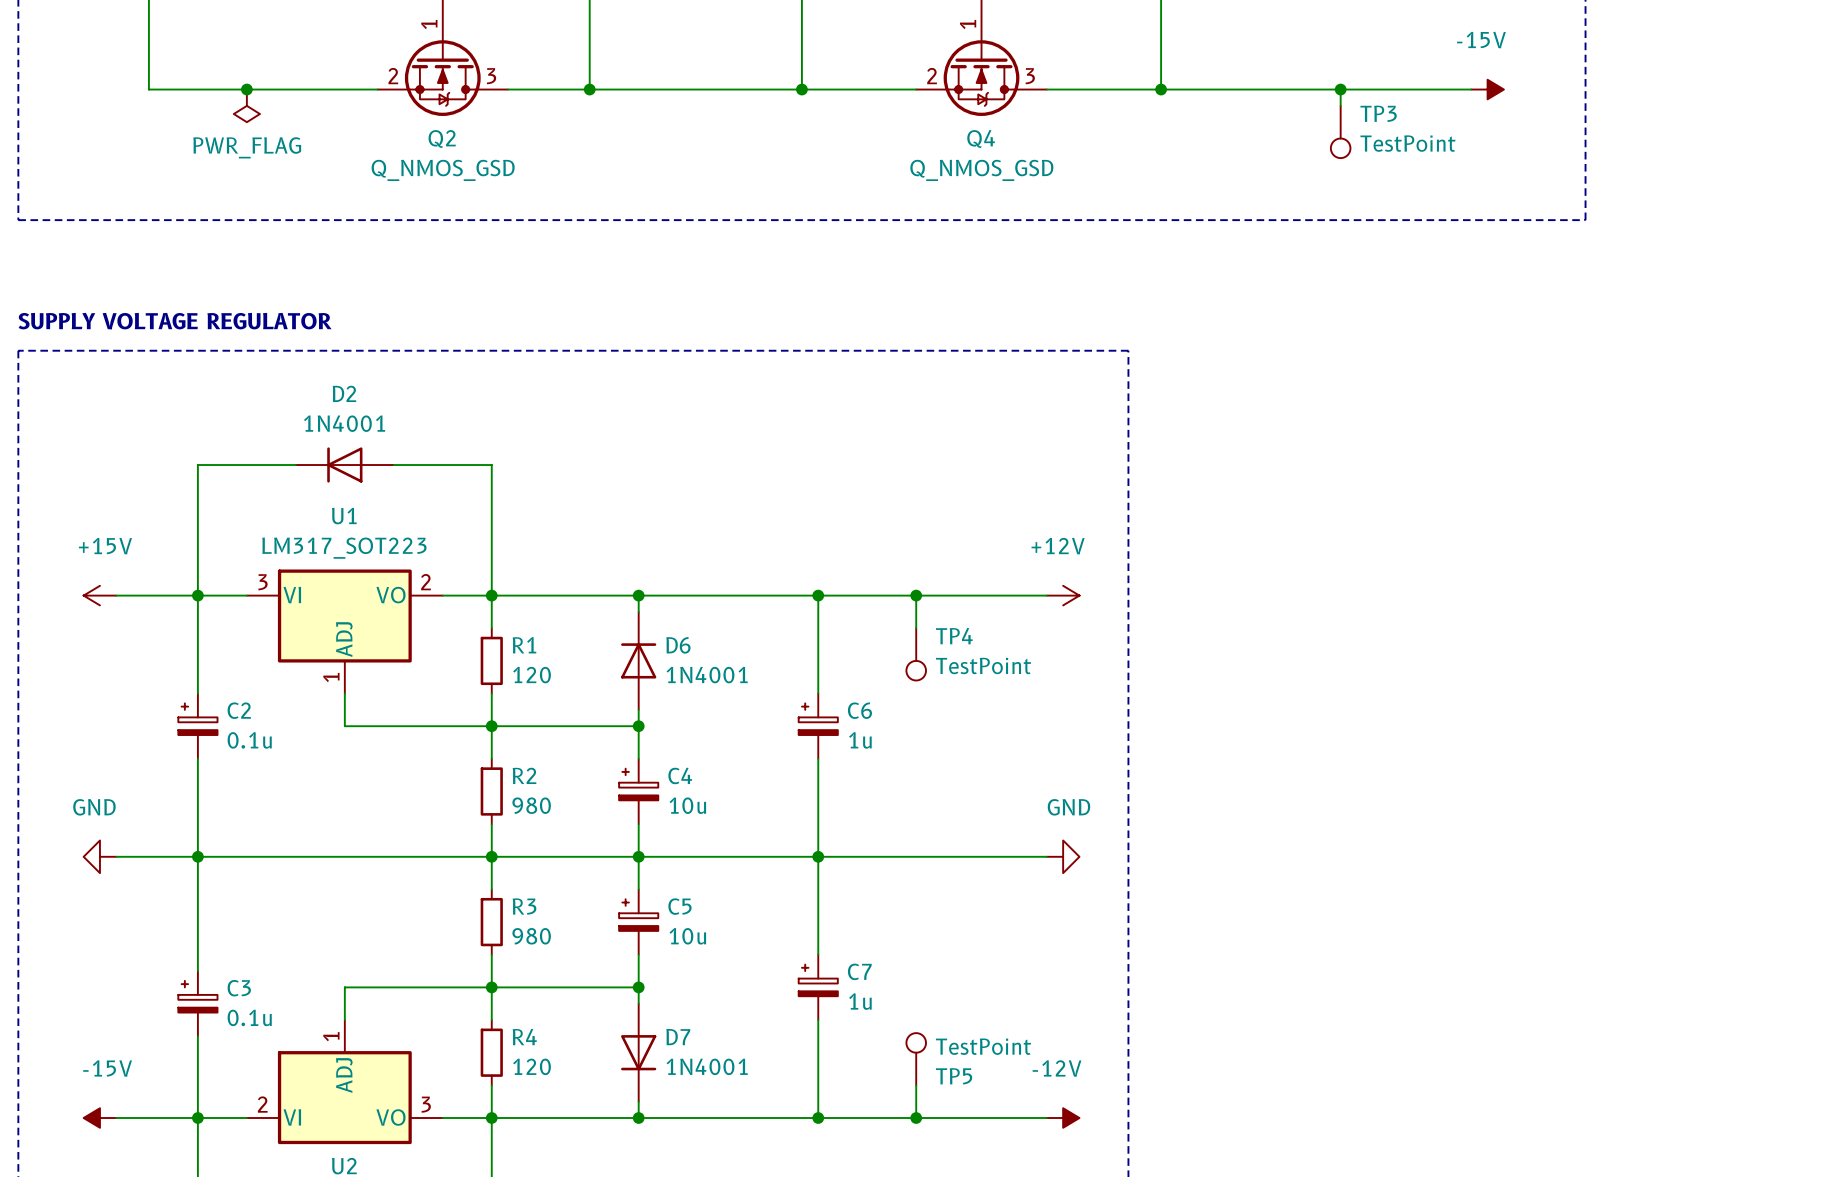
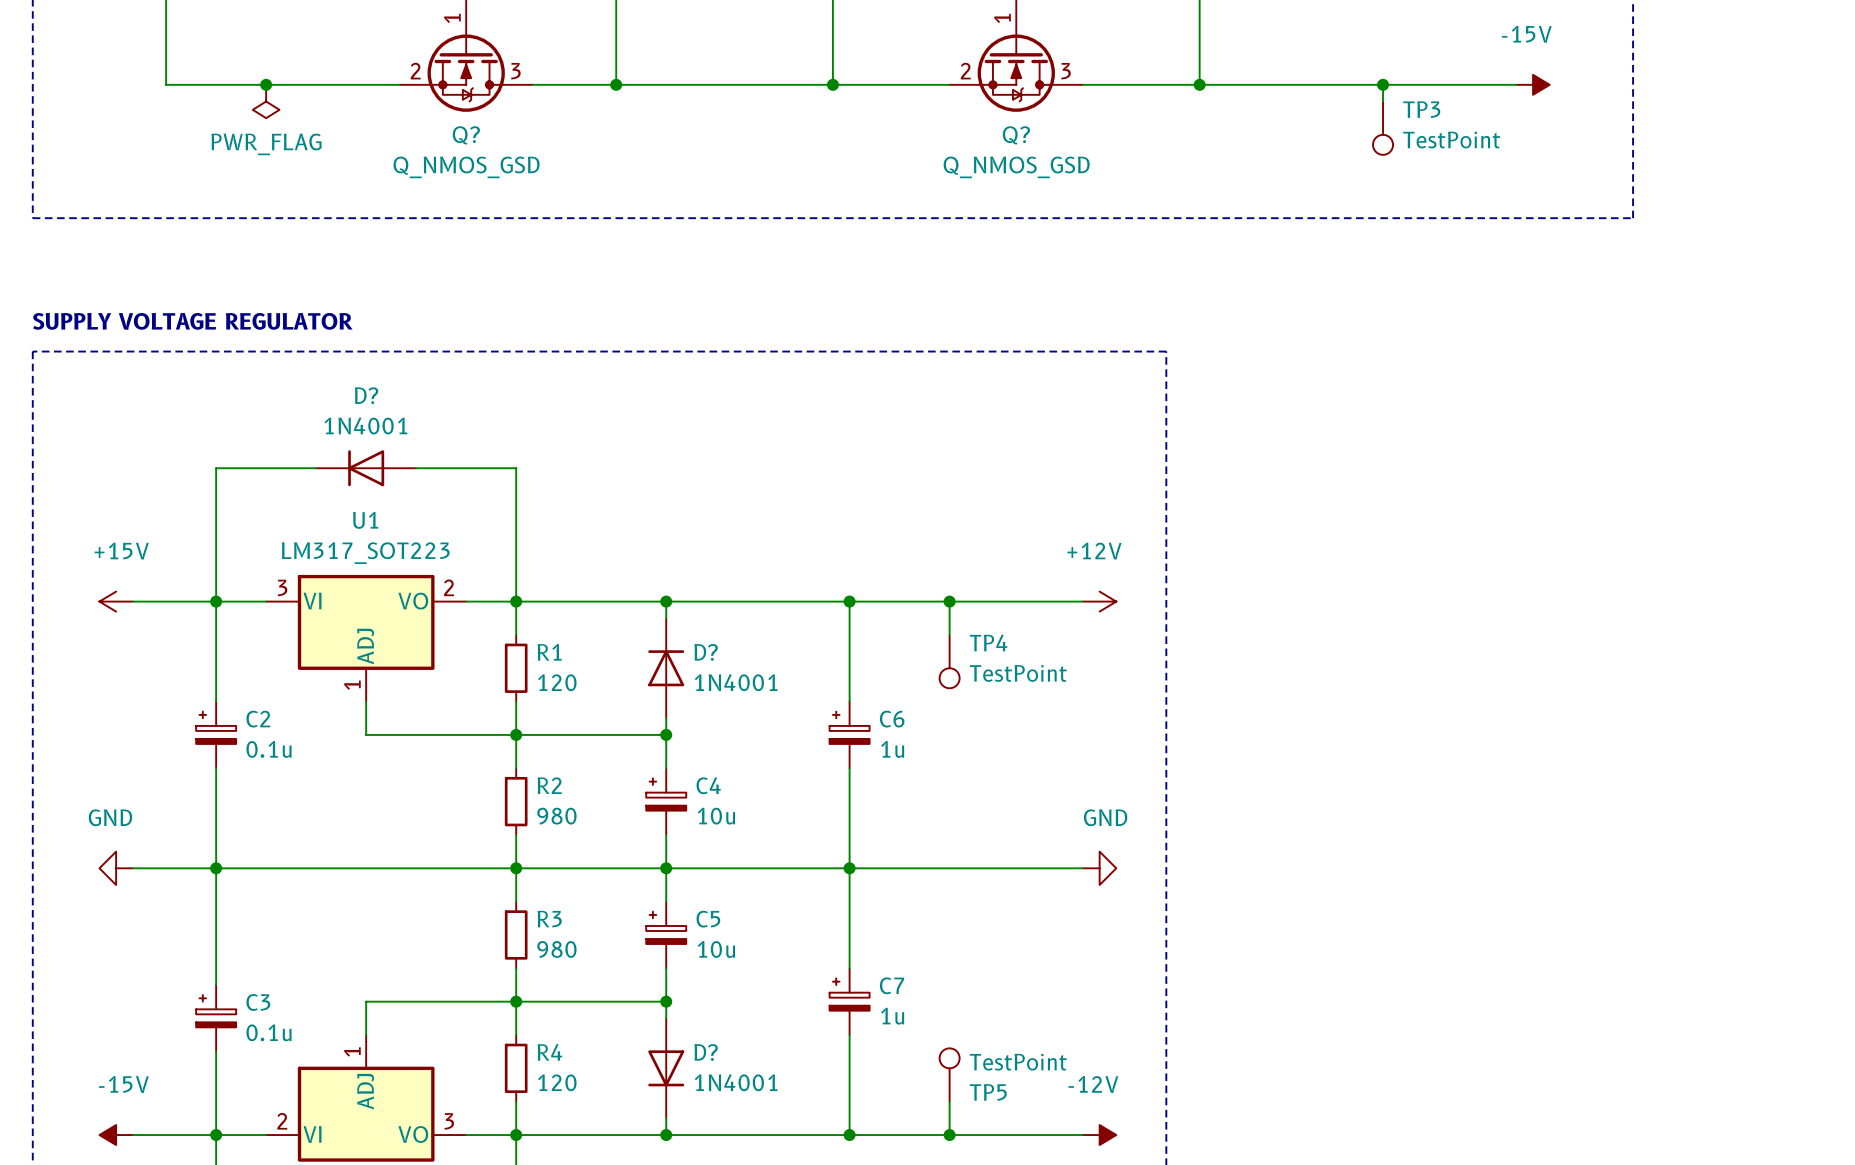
Q2 name: Q2 (442, 139) -> Q? (466, 135)
Q4 name: Q4 (981, 139) -> Q? (1016, 135)
D2 name: D2 (344, 393) -> D? (366, 395)
D6 name: D6 (678, 645) -> D? (706, 652)
D7 name: D7 (678, 1037) -> D? (706, 1052)

